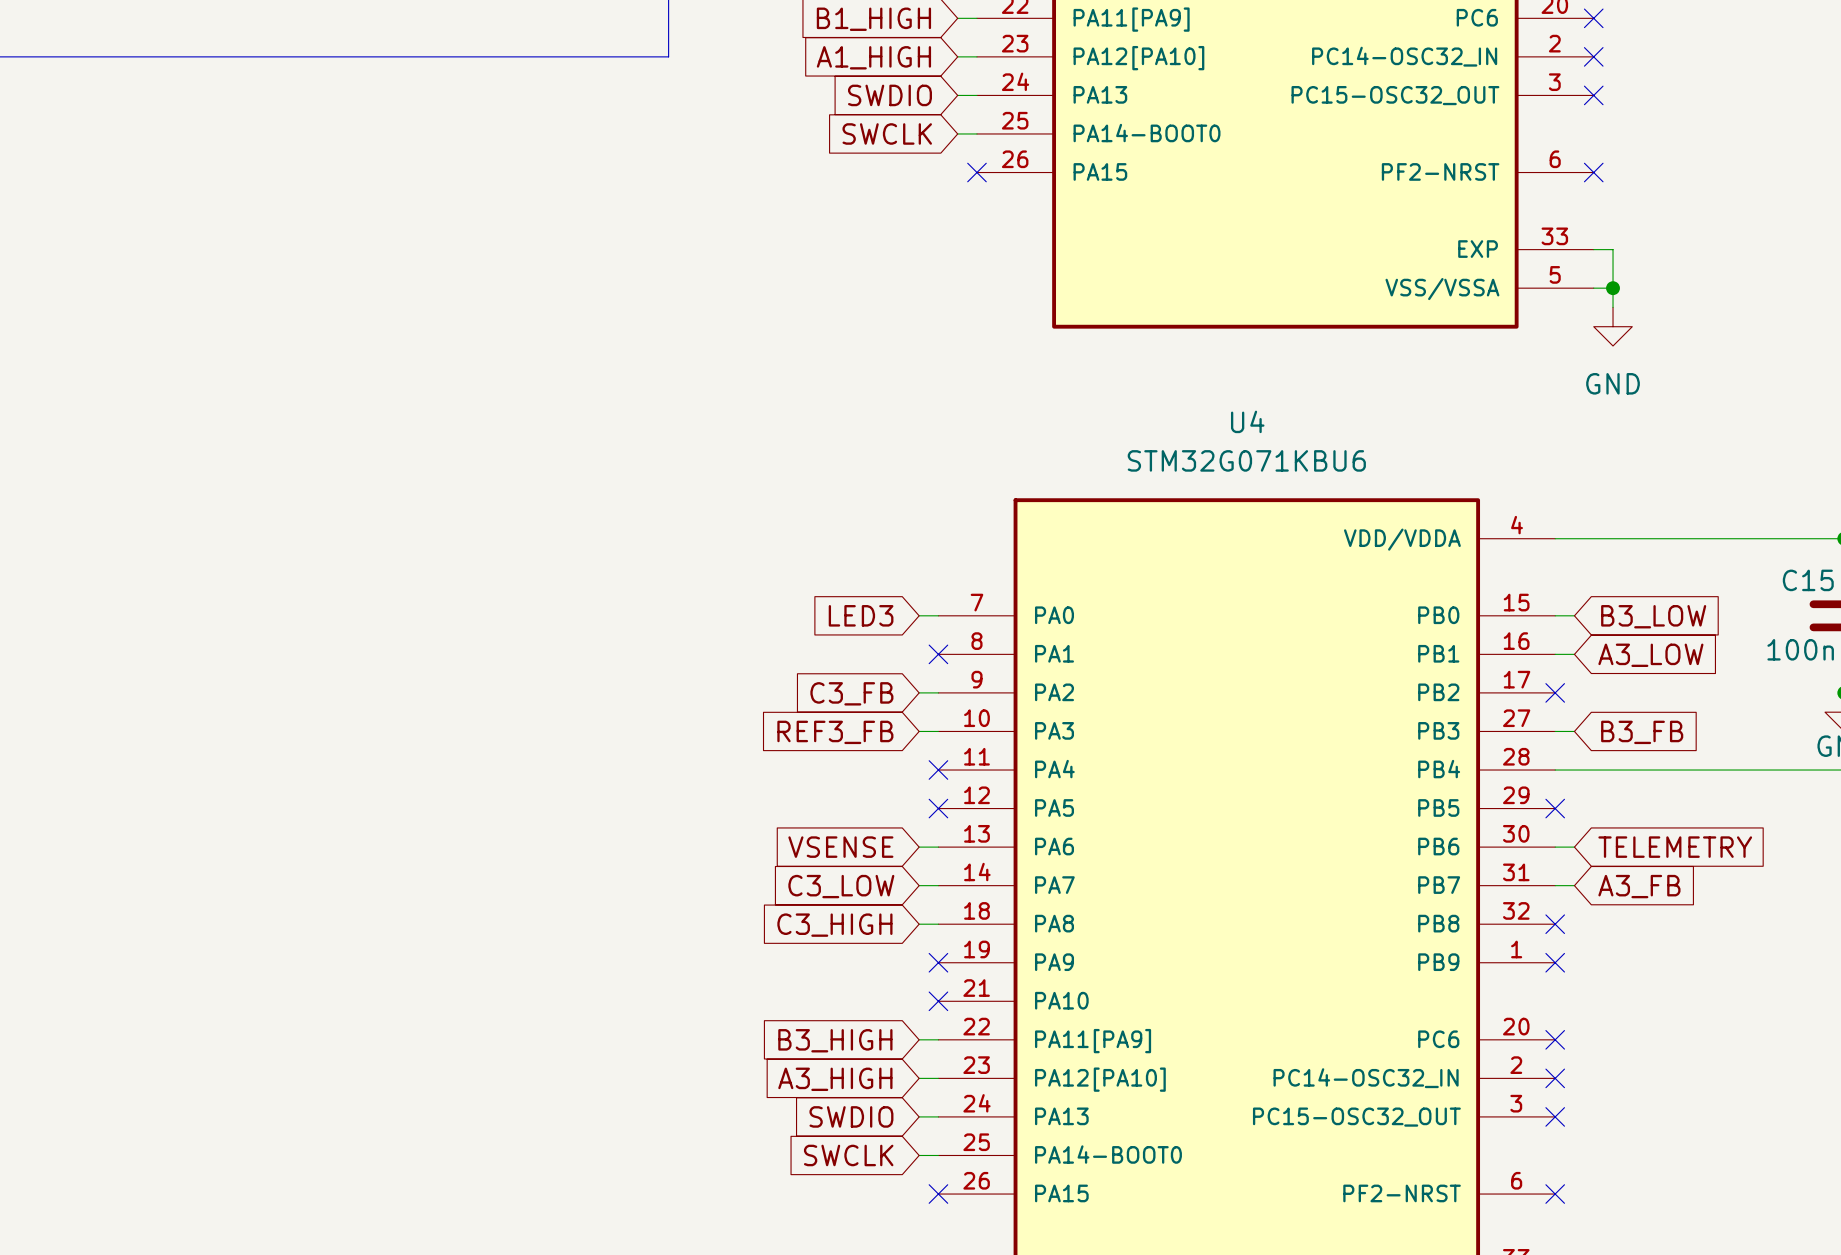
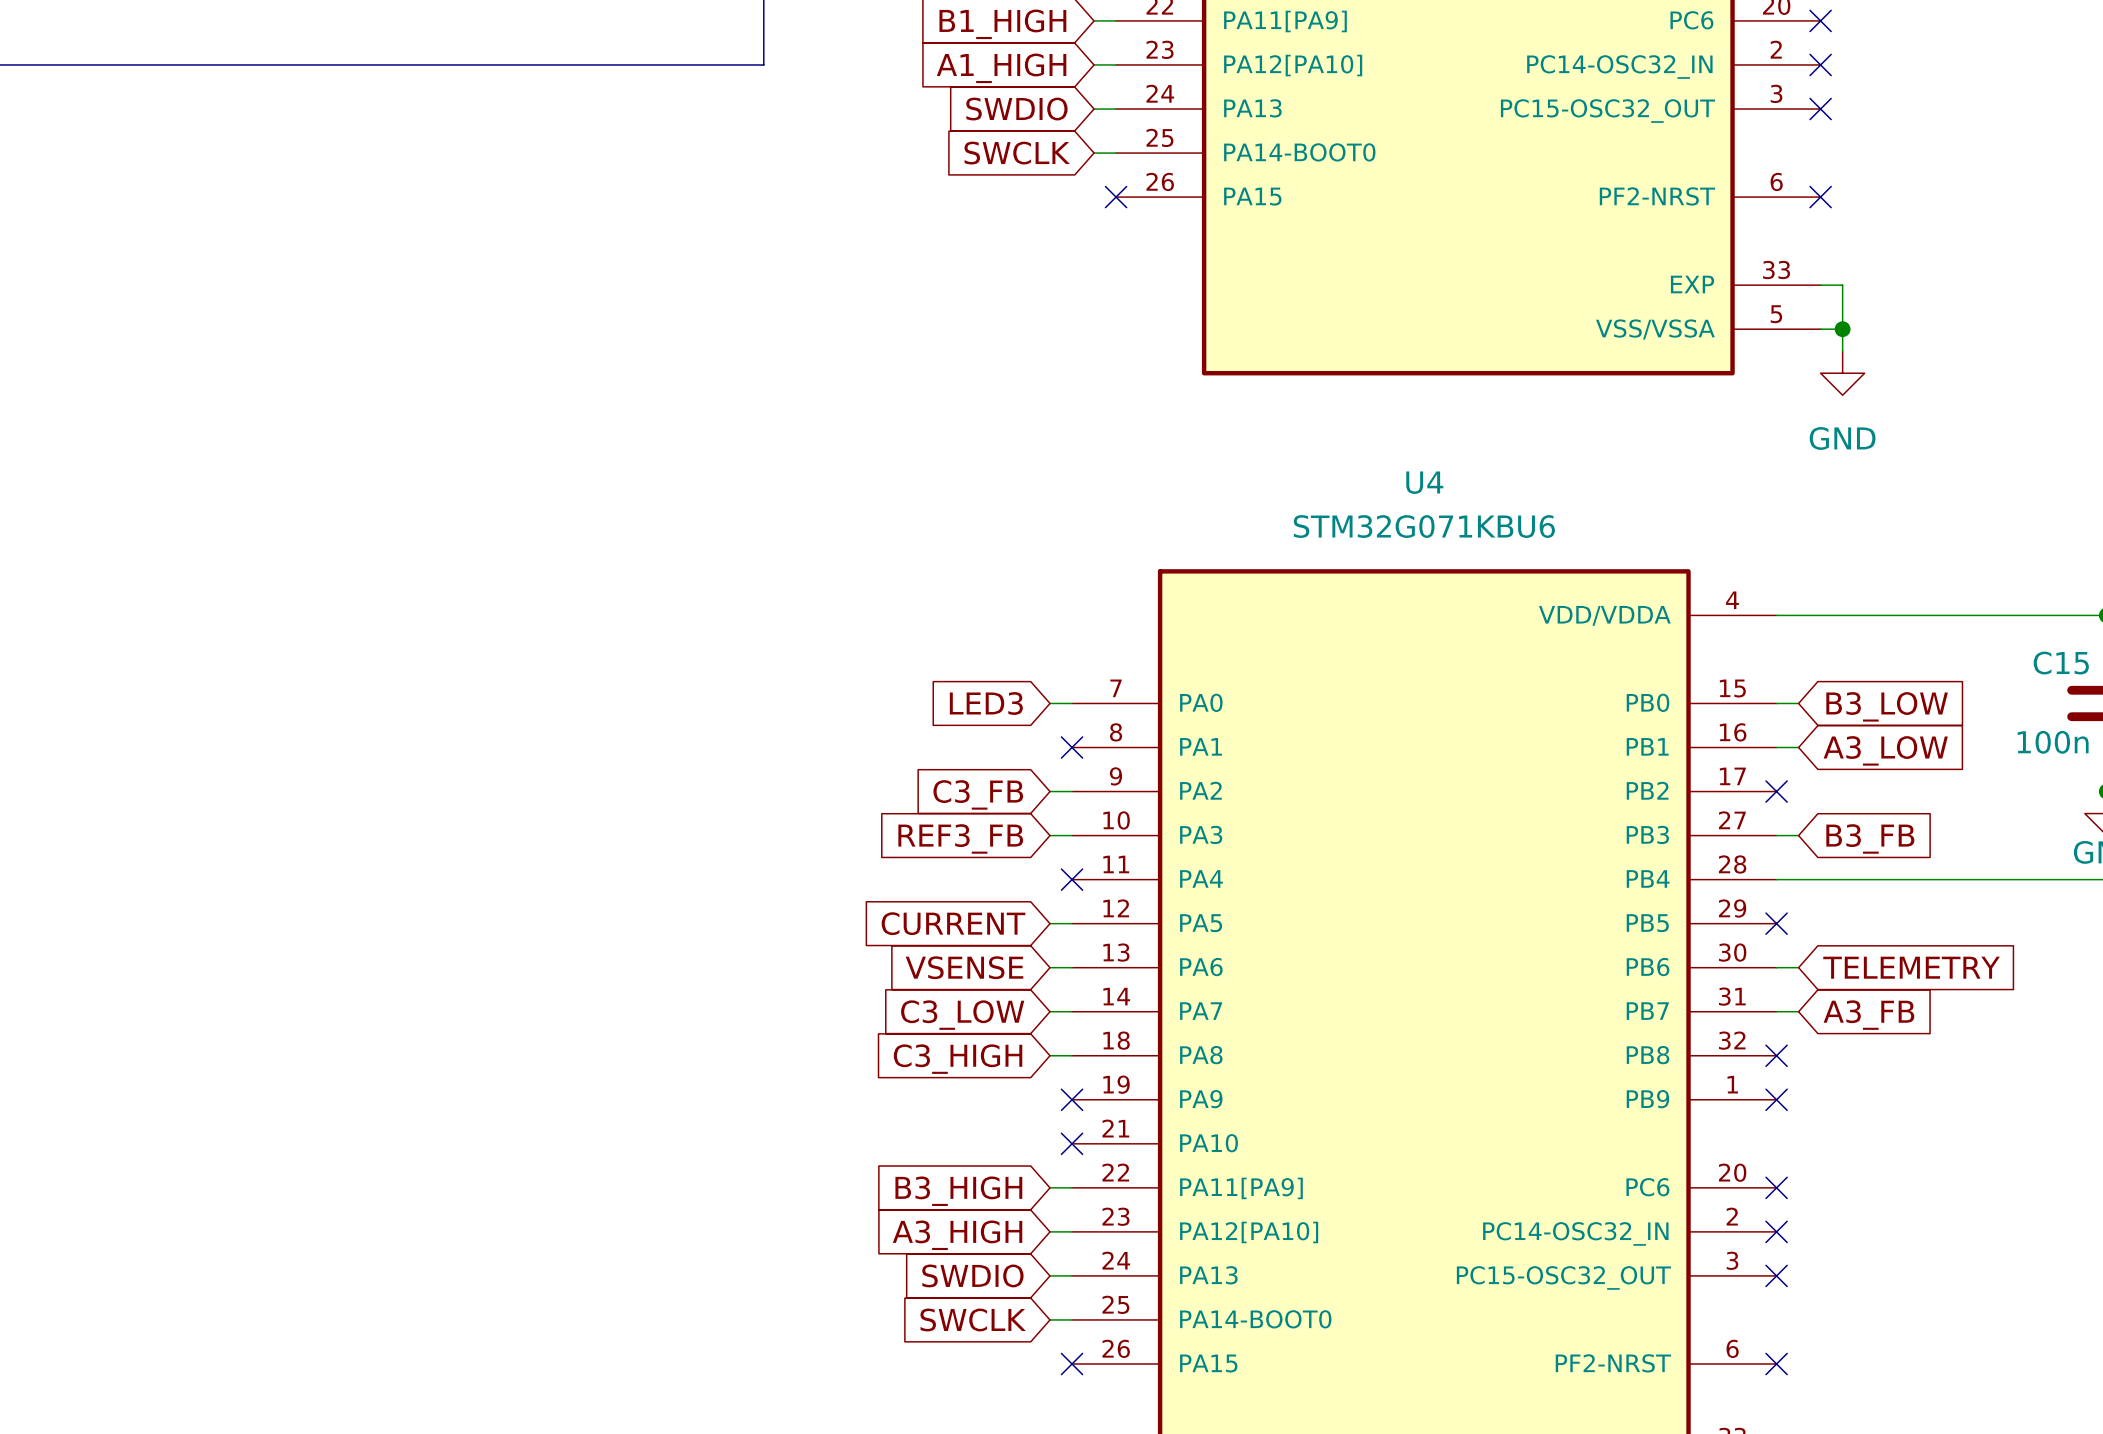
global label: none -> CURRENT (953, 923)
wire: none -> (1050, 923) (1072, 923)
no-connect mark: (938, 808) -> none

